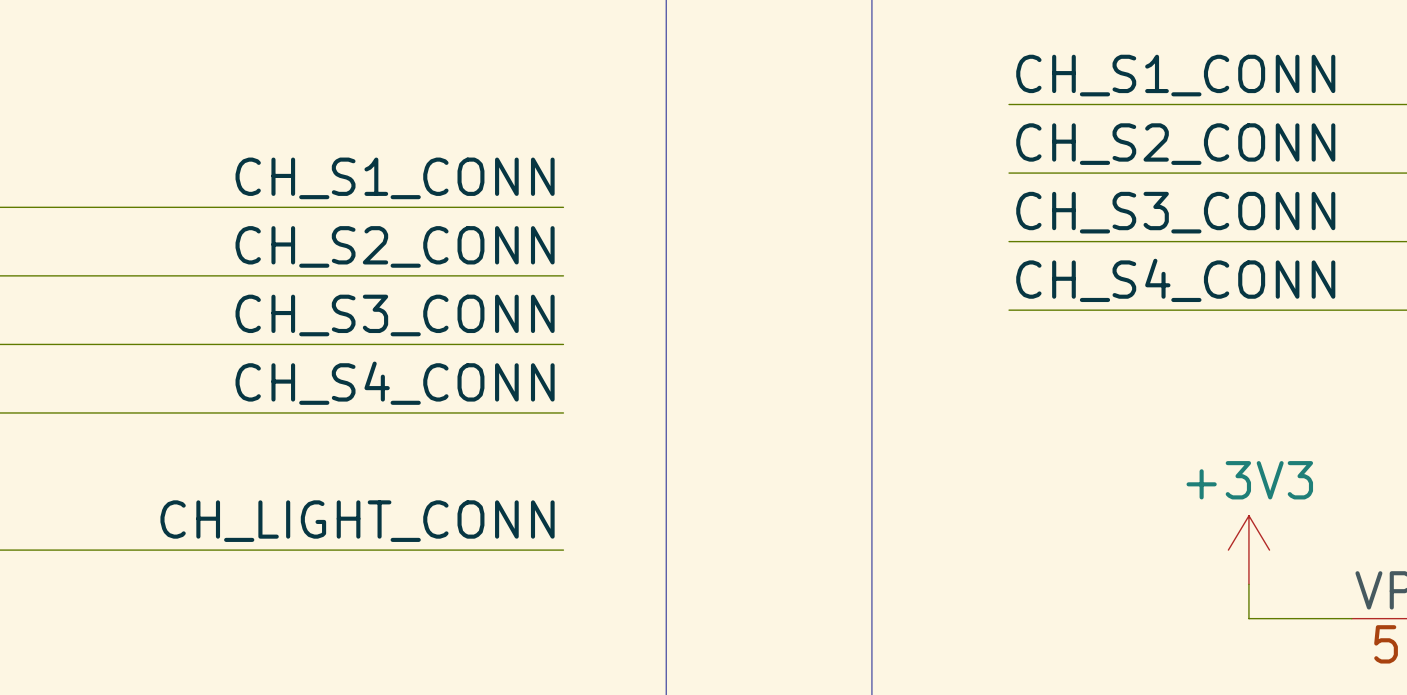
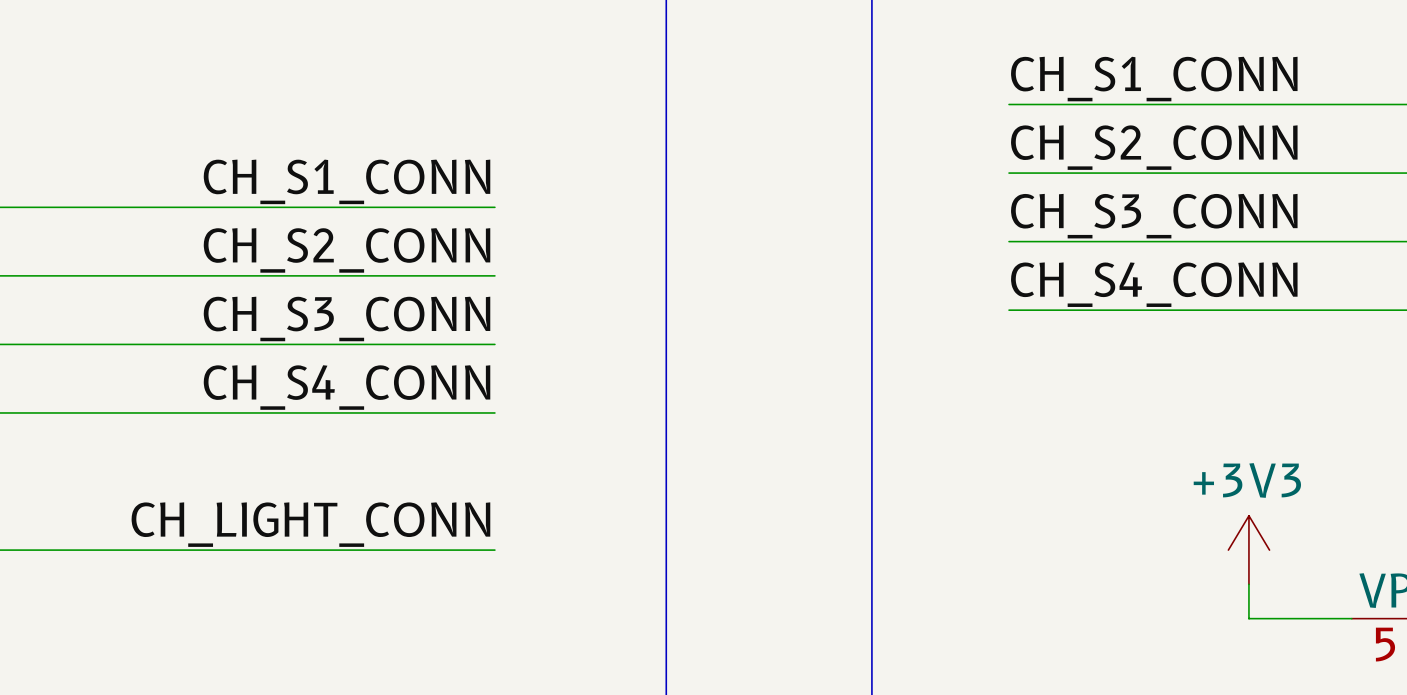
label position: CH_S1_CONN (395, 178) -> CH_S1_CONN (347, 181)
wire: (494, 207) (563, 207) -> none
label position: CH_S2_CONN (395, 246) -> CH_S2_CONN (347, 250)
wire: (494, 275) (563, 275) -> none
label position: CH_S3_CONN (395, 315) -> CH_S3_CONN (347, 318)
wire: (494, 344) (563, 344) -> none
label position: CH_S4_CONN (395, 383) -> CH_S4_CONN (347, 387)
wire: (494, 412) (563, 412) -> none
label position: CH_LIGHT_CONN (357, 521) -> CH_LIGHT_CONN (310, 524)
wire: (494, 550) (563, 550) -> none

